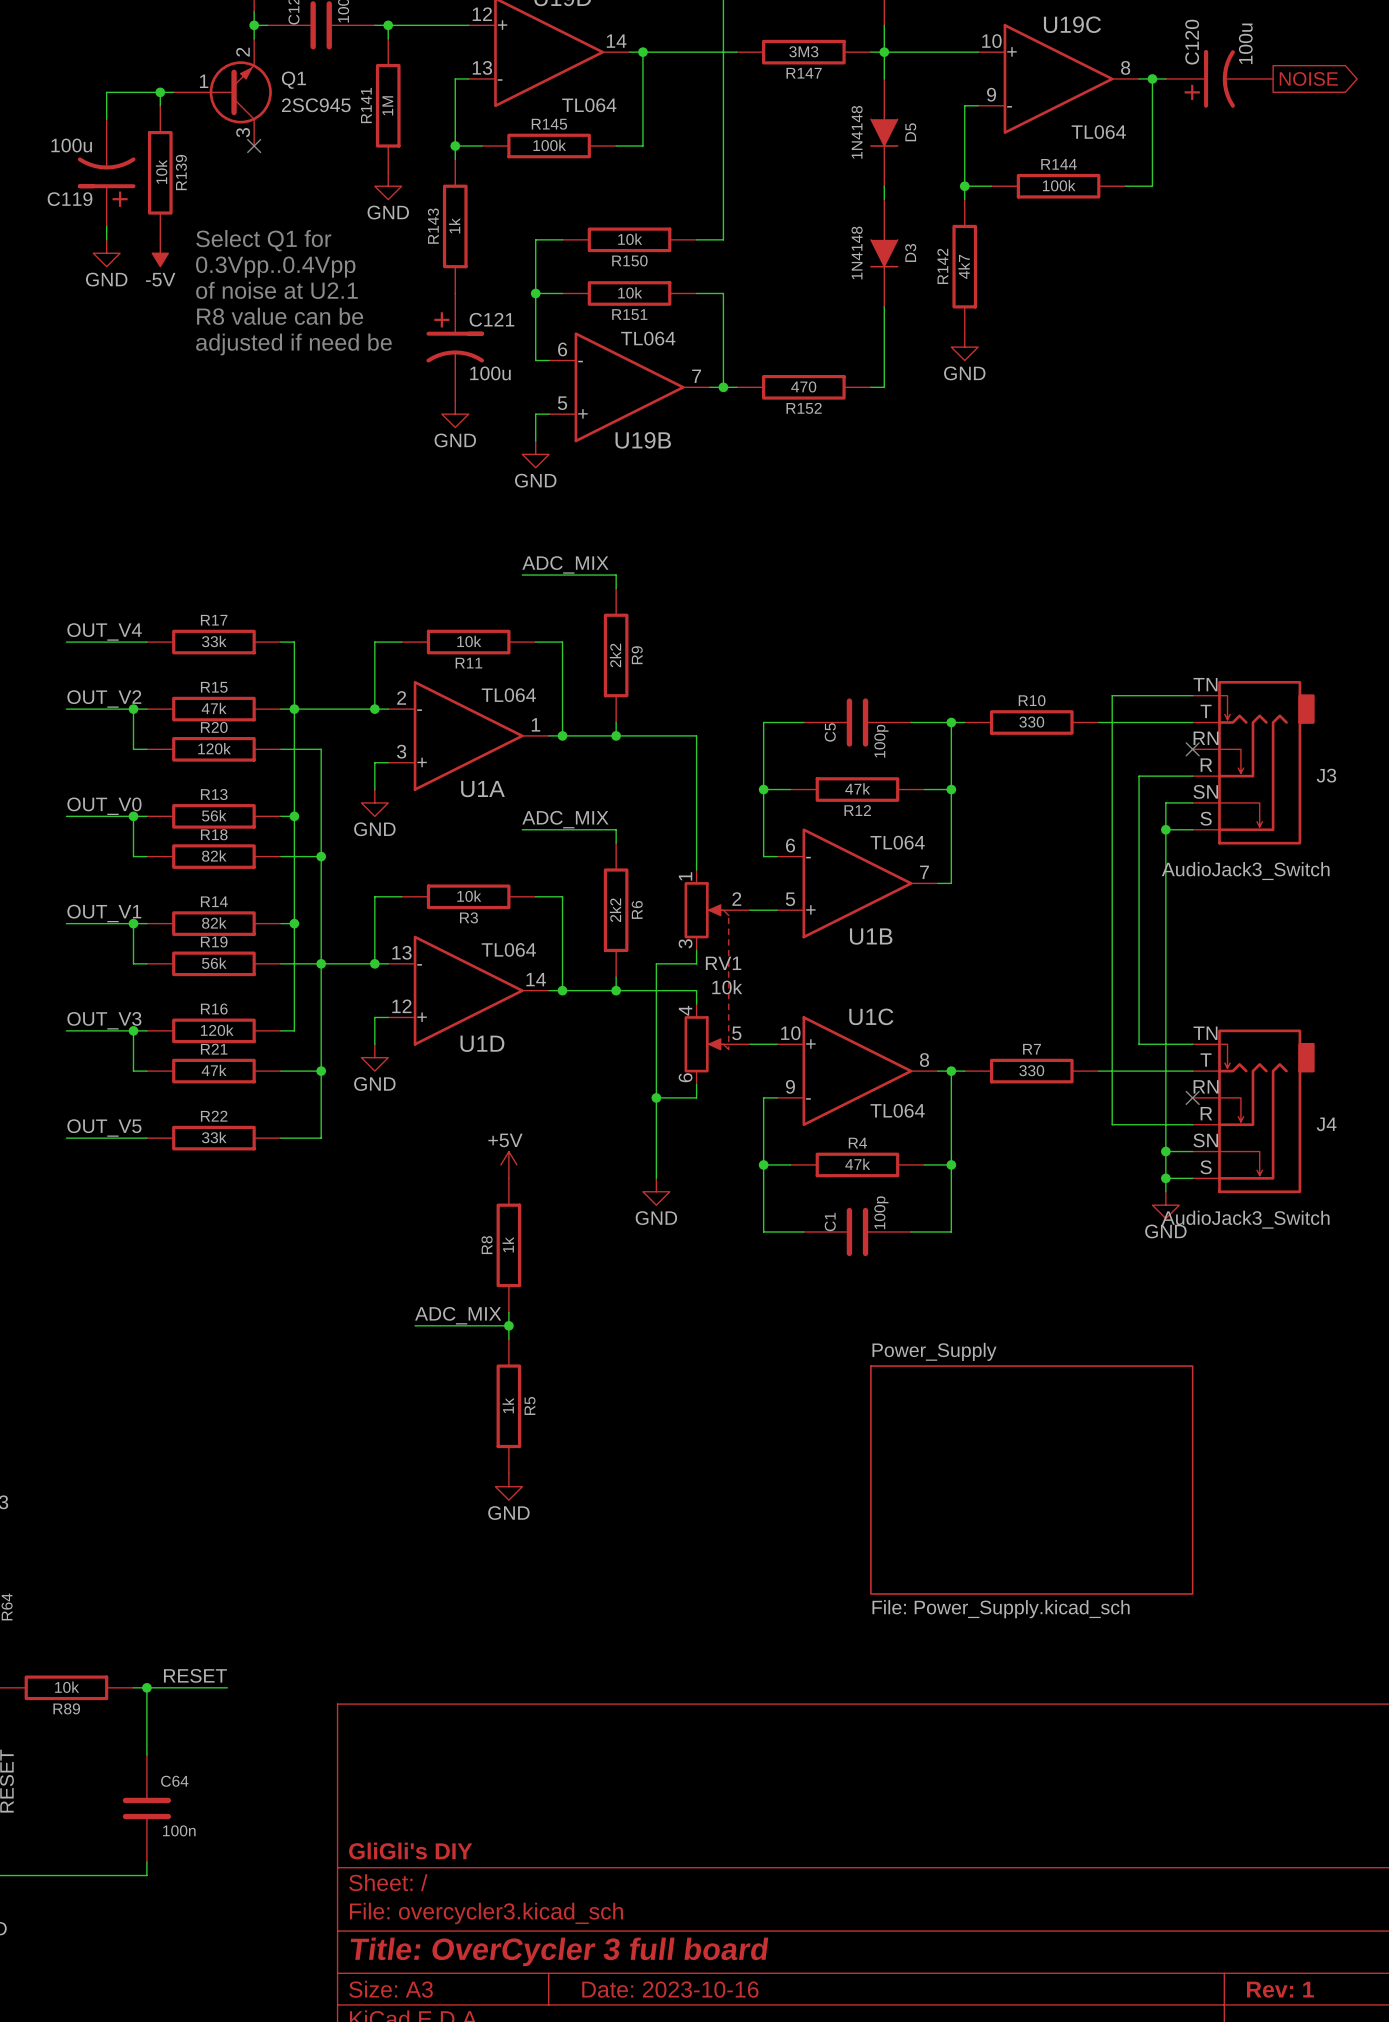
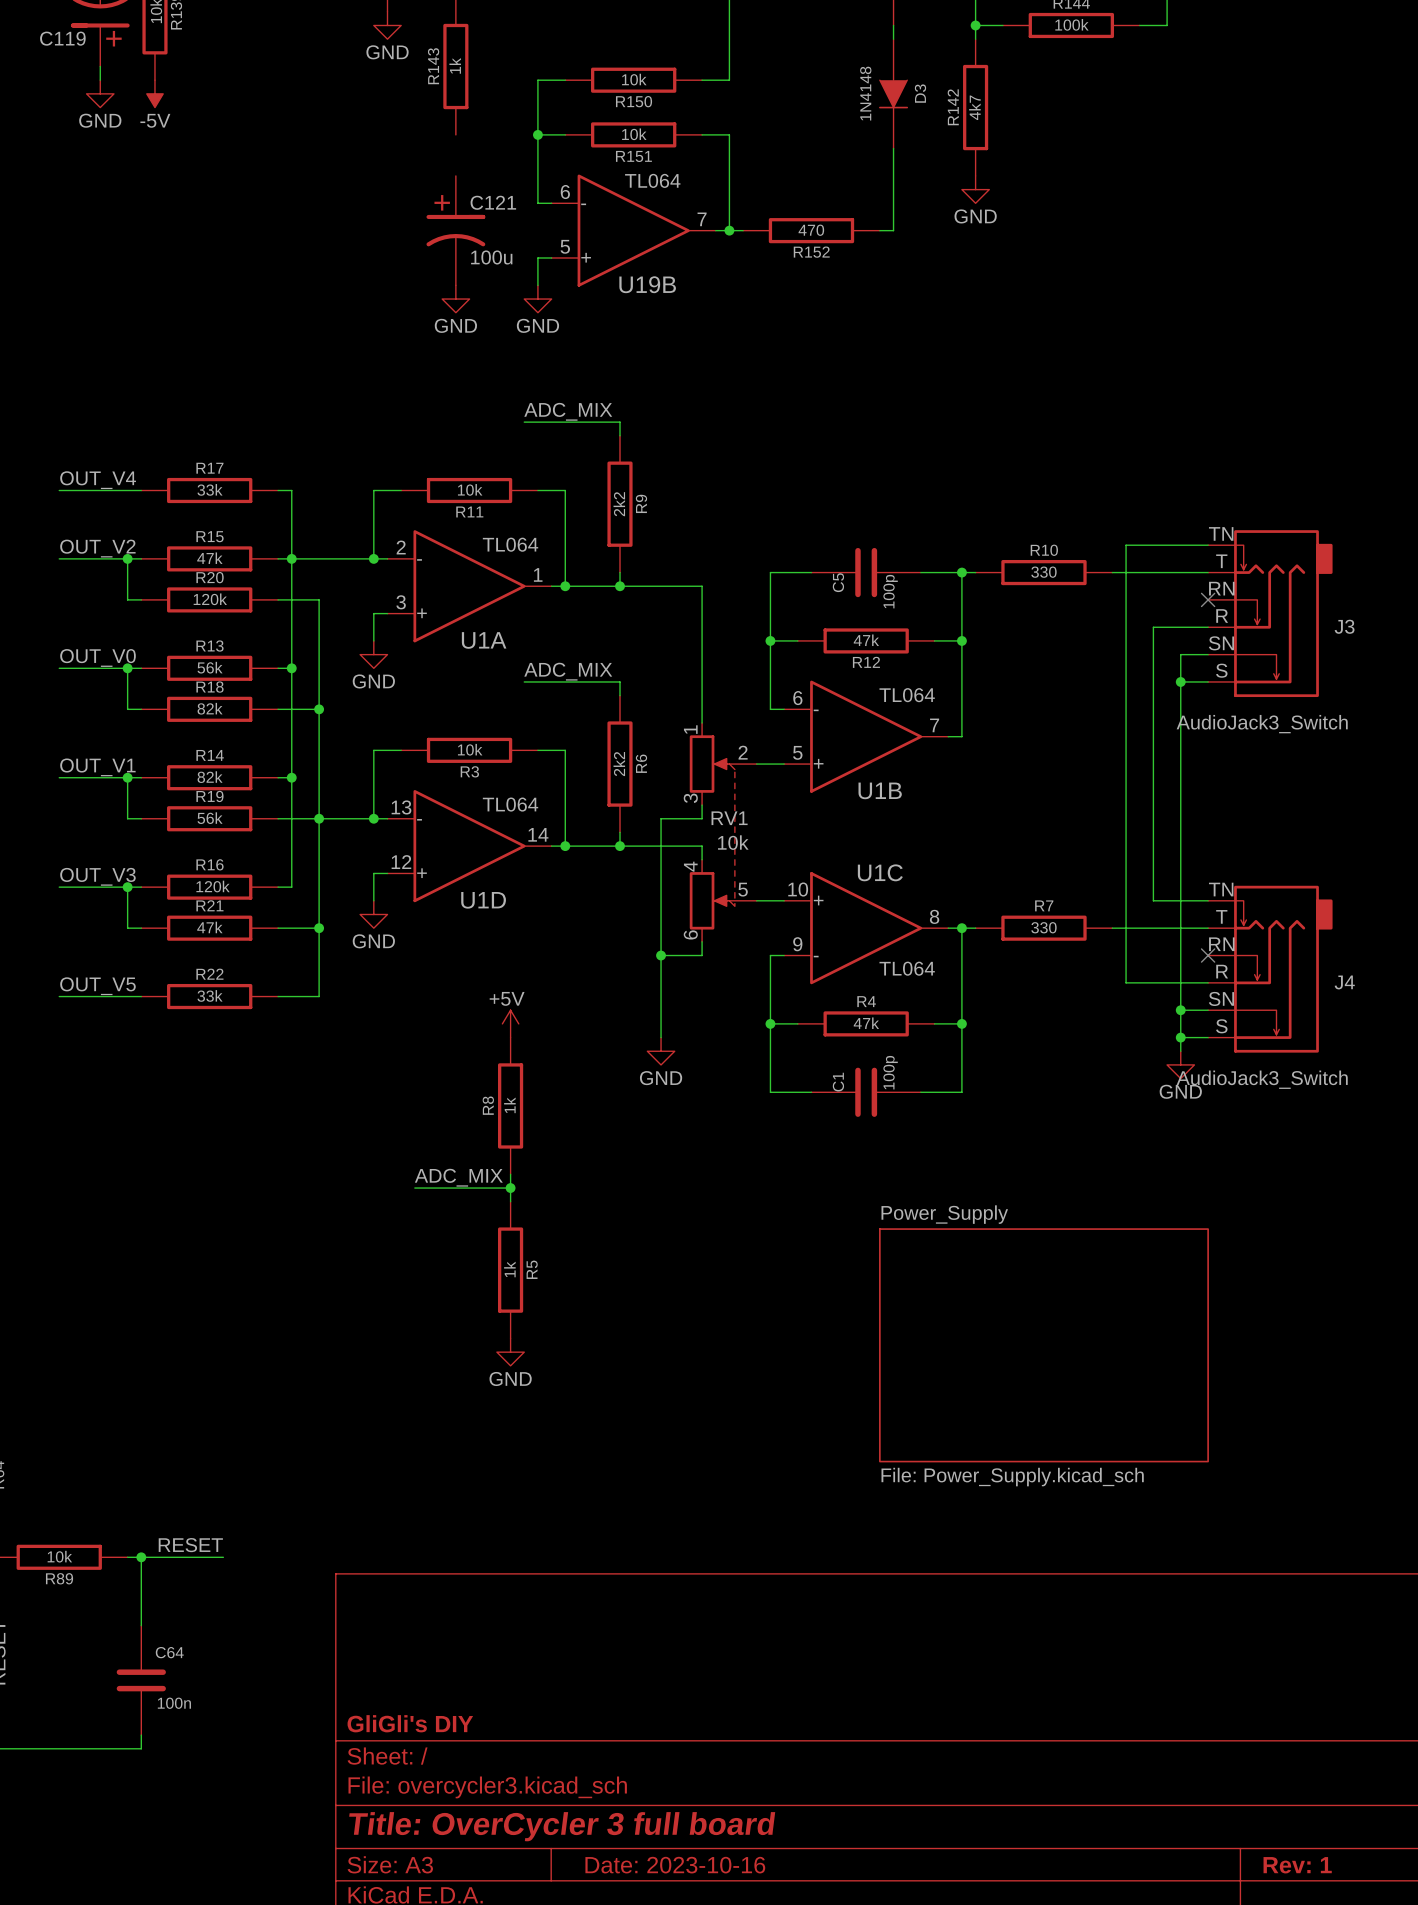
text: Select Q1 for (263, 240) -> none
text: 0.3Vpp..0.4Vpp (275, 267) -> none
text: of noise at U2.1 (276, 290) -> none
text: R8 value can be (280, 316) -> none
text: adjusted if need be (293, 344) -> none
C121 position: (455, 347) -> (455, 230)
power symbol position: GND (455, 414) -> GND (455, 299)

